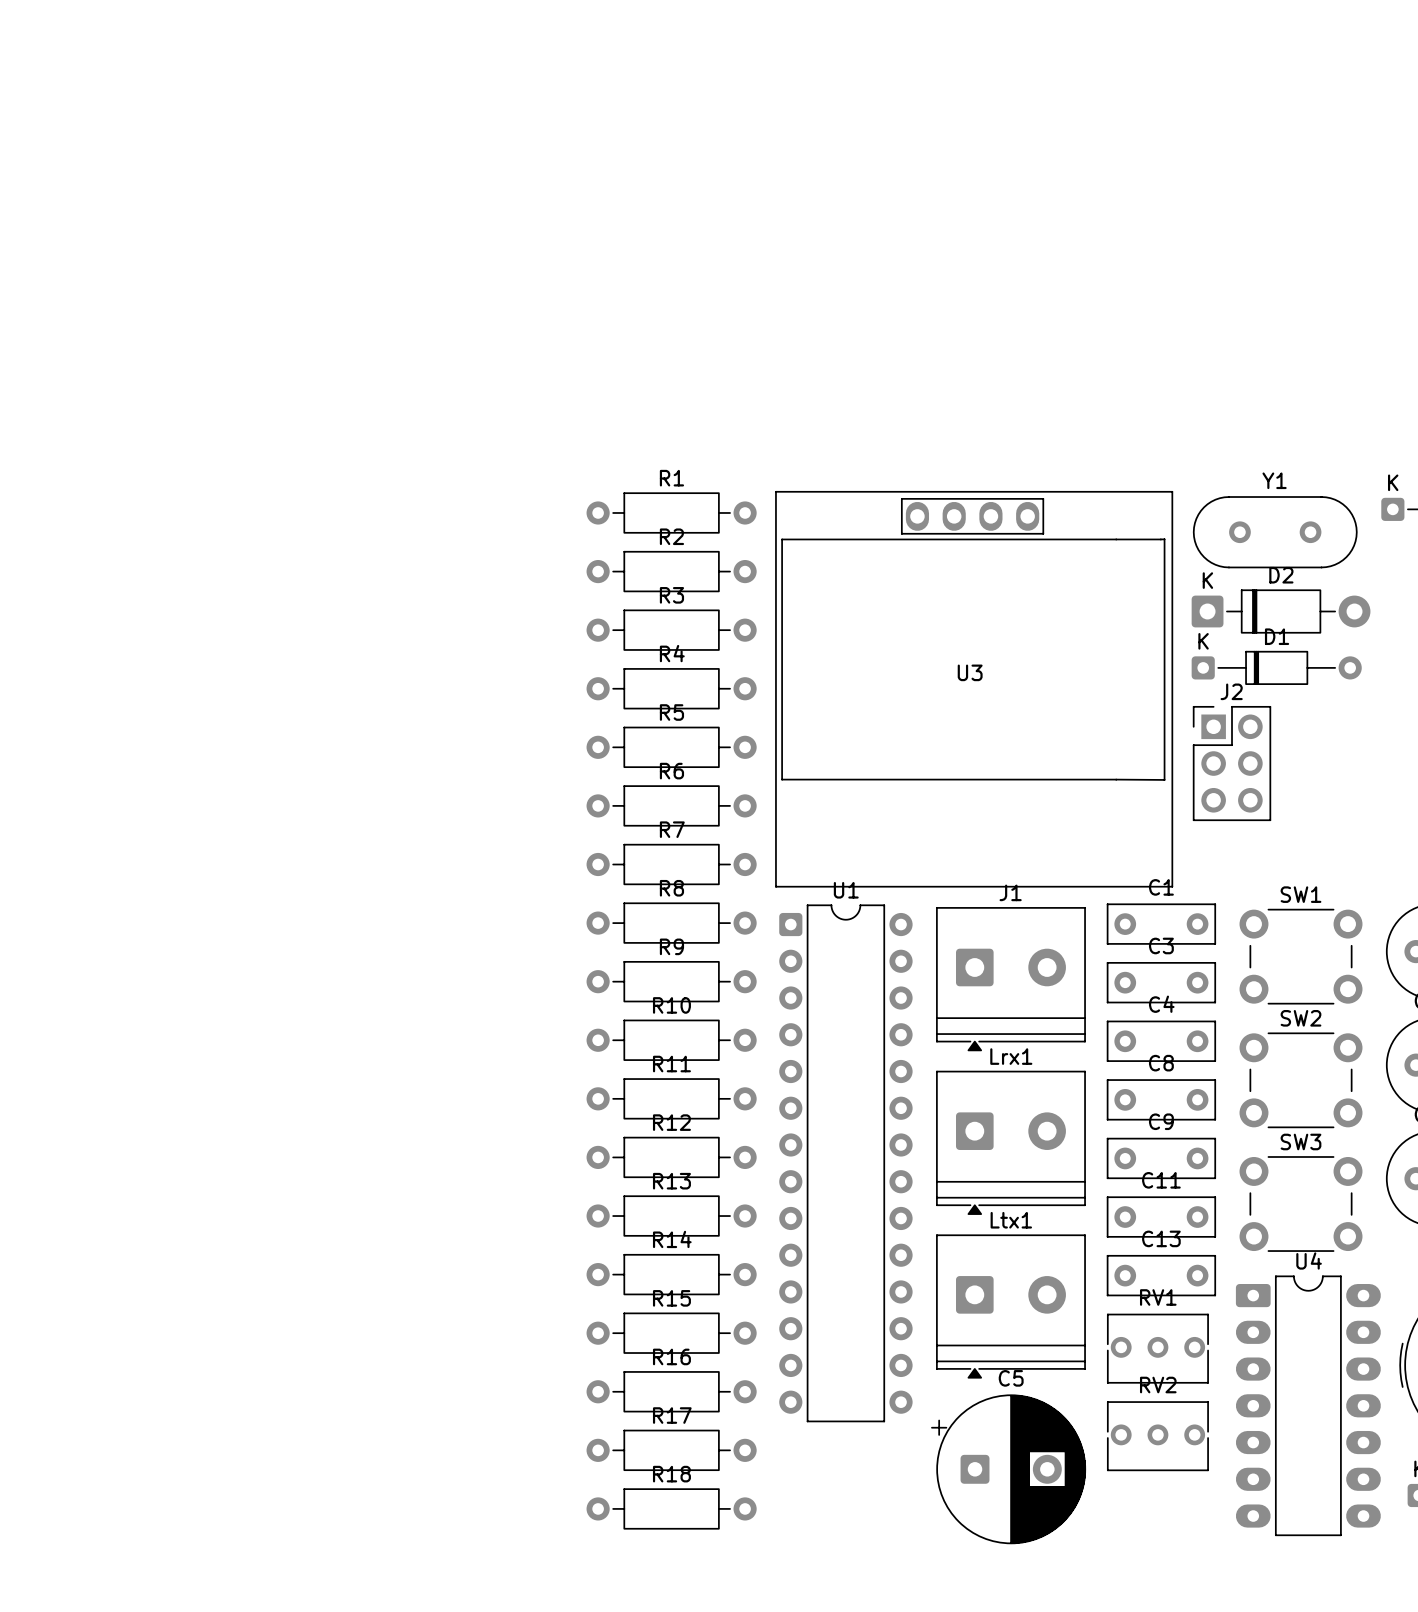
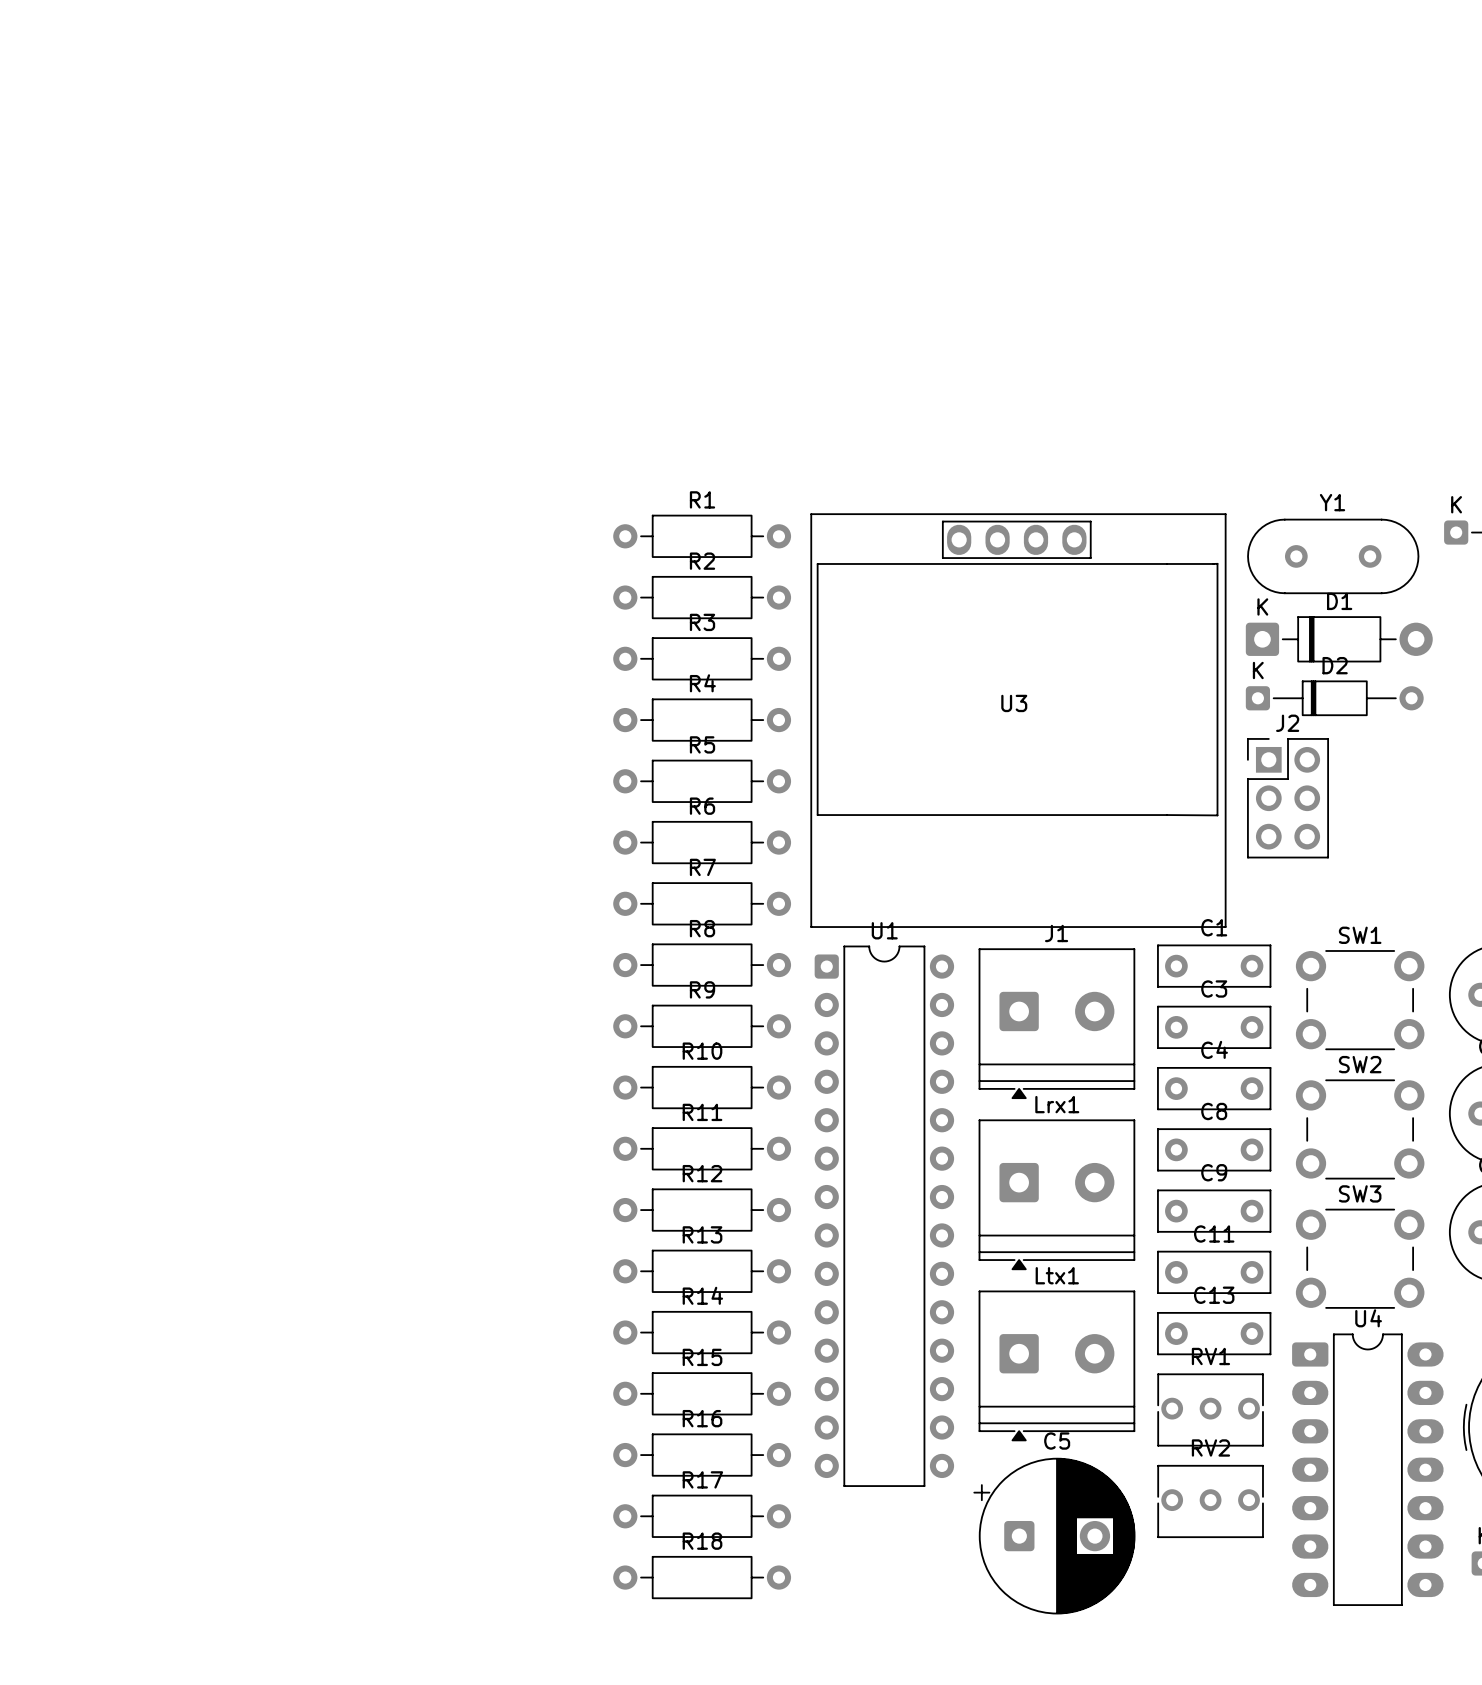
D2 name: D2 (1281, 575) -> D1 (1339, 601)
D1 name: D1 (1277, 636) -> D2 (1335, 665)

